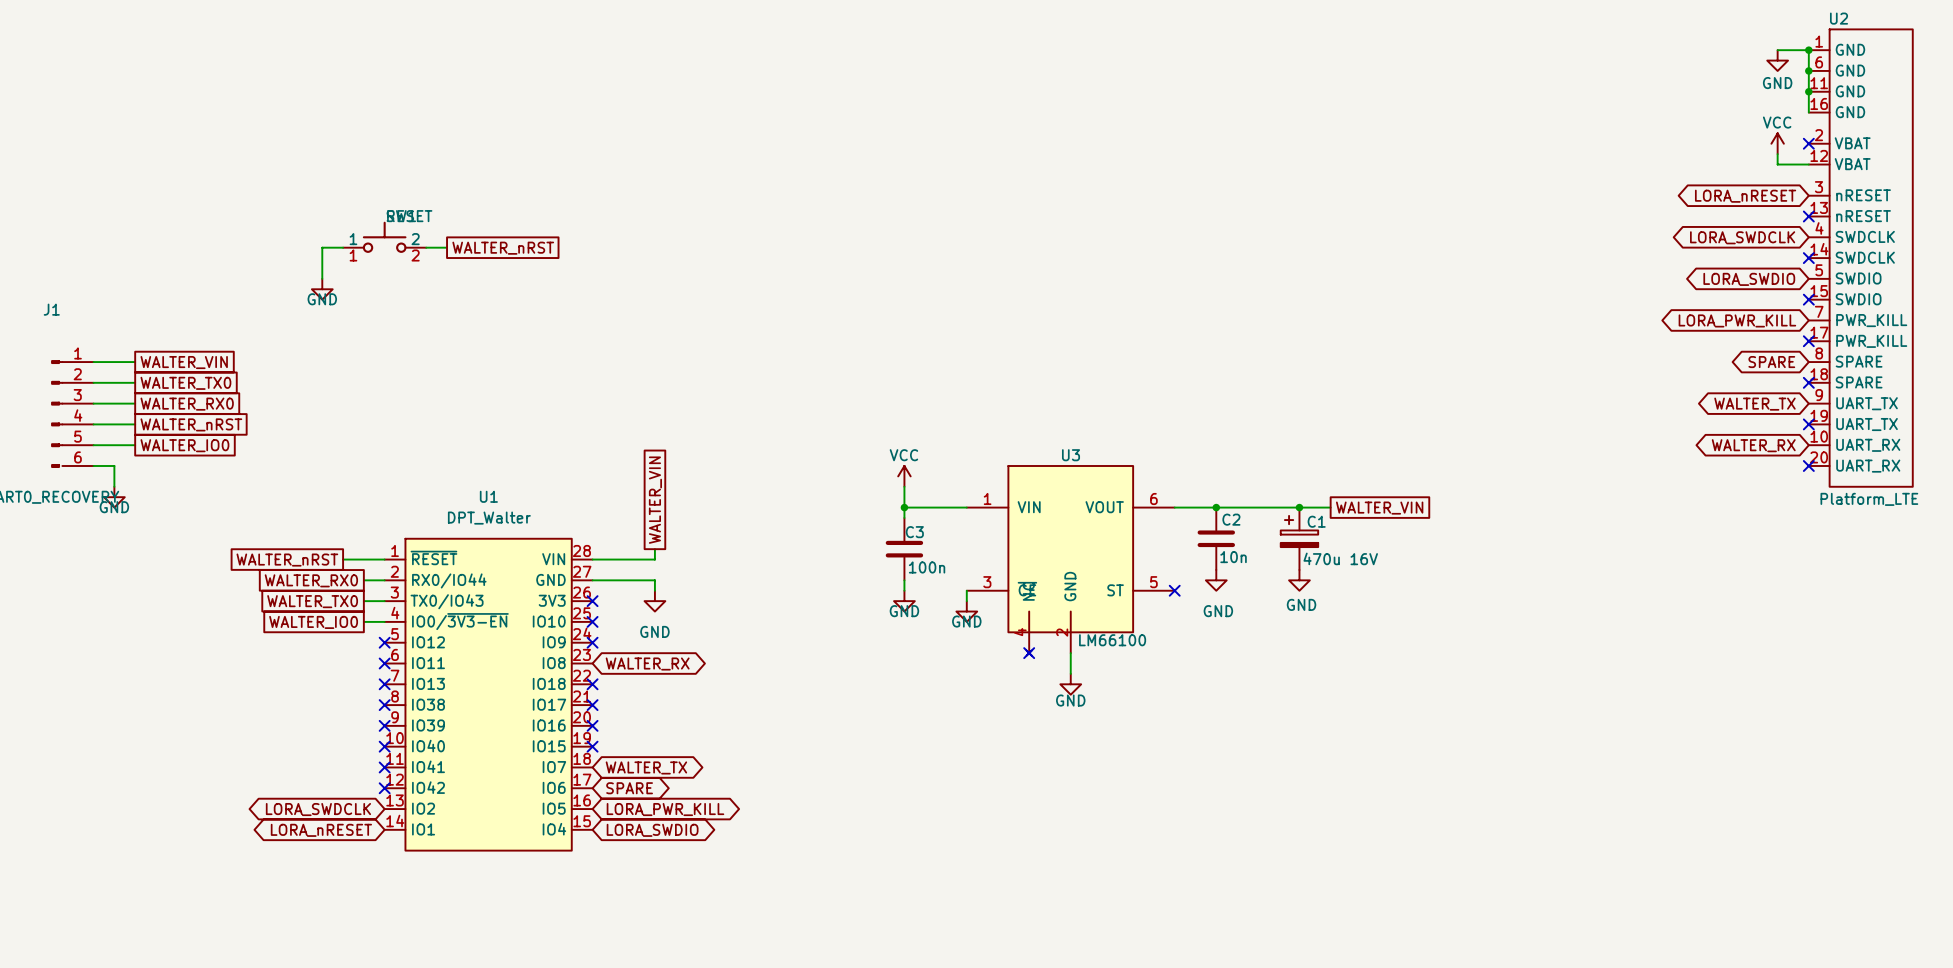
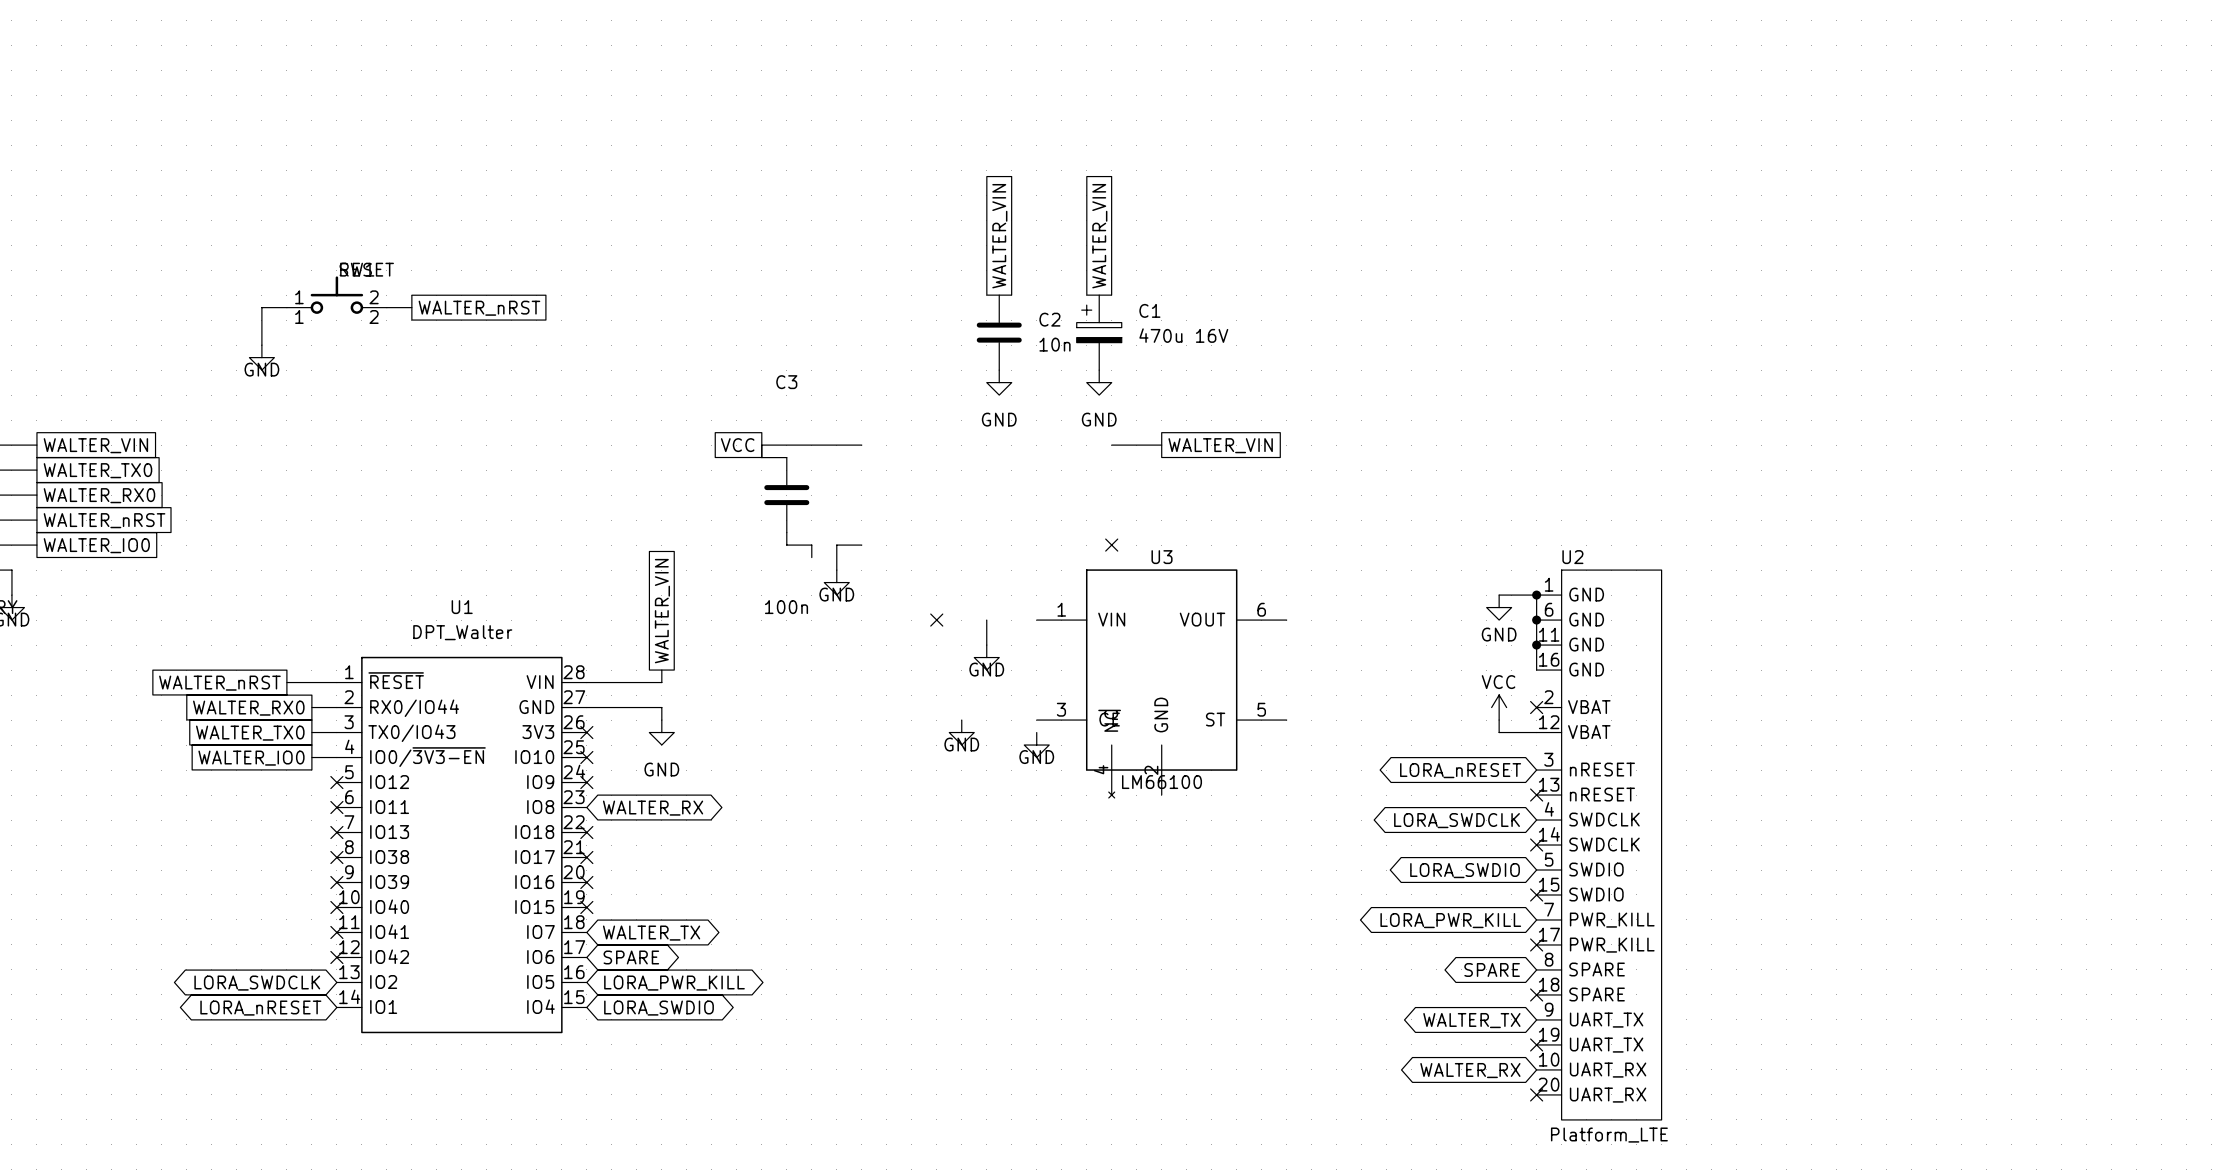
wire: (1777, 50) (1808, 50) (1808, 112) -> none
junction: (1808, 50) -> none
power symbol: GND (1777, 60) -> none
junction: (1808, 70) -> none
junction: (1808, 91) -> none
power symbol: VCC (1777, 143) -> none
no-connect mark: (1808, 143) -> none
wire: (1777, 154) (1777, 164) (1808, 164) -> none
global label: none -> WALTER_VIN (999, 236)
global label: none -> WALTER_VIN (1099, 236)
global label: LORA_nRESET (1745, 196) -> none
no-connect mark: (1808, 216) -> none
global label: LORA_SWDCLK (1742, 237) -> none
no-connect mark: (1808, 258) -> none
U2 position: (1860, 258) -> (1599, 845)
global label: LORA_SWDIO (1749, 279) -> none
no-connect mark: (1808, 299) -> none
power symbol: none -> GND (999, 382)
power symbol: none -> GND (1099, 382)
global label: LORA_PWR_KILL (1737, 320) -> none
no-connect mark: (1808, 341) -> none
global label: none -> VCC (737, 445)
wire: none -> (861, 445) (761, 445) (761, 457) (786, 457)
wire: none -> (1111, 445) (1161, 445)
global label: none -> WALTER_VIN (1220, 445)
global label: SPARE (1771, 362) -> none
no-connect mark: (1808, 382) -> none
global label: WALTER_TX (1754, 404) -> none
no-connect mark: (1808, 424) -> none
wire: none -> (786, 532) (786, 545) (811, 545) (811, 557)
wire: none -> (861, 545) (836, 545) (836, 570)
no-connect mark: none -> (1111, 545)
global label: WALTER_RX (1753, 445) -> none
no-connect mark: (1808, 465) -> none
power symbol: none -> GND (836, 582)
power symbol: VCC (904, 476) -> none
wire: (904, 486) (904, 517) -> none
wire: none -> (1499, 595) (1536, 595) (1536, 670)
junction: none -> (1536, 595)
power symbol: none -> GND (1499, 607)
no-connect mark: none -> (936, 620)
wire: (904, 507) (966, 507) -> none
junction: (904, 507) -> none
wire: none -> (986, 620) (986, 645)
wire: (1174, 507) (1330, 507) -> none
junction: (1216, 507) -> none
junction: (1299, 507) -> none
junction: none -> (1536, 620)
global label: WALTER_VIN (1379, 508) -> none
C2 name position: C2 (1231, 519) -> C2 (1049, 319)
C1 name position: C1 (1316, 521) -> C1 (1149, 310)
junction: none -> (1536, 645)
C3 name position: C3 (914, 532) -> C3 (786, 382)
power symbol: none -> GND (986, 657)
C2 position: (1216, 538) -> (999, 332)
C1 position: (1299, 538) -> (1099, 332)
C3 position: (904, 549) -> (786, 495)
C2 value position: 10n (1233, 557) -> 10n (1054, 344)
C1 value position: 470u 16V (1340, 558) -> 470u 16V (1183, 335)
C3 value position: 100n (927, 567) -> 100n (786, 607)
wire: (904, 580) (904, 590) -> none
power symbol: GND (1216, 580) -> none
power symbol: GND (1299, 580) -> none
power symbol: none -> VCC (1499, 707)
no-connect mark: none -> (1536, 707)
wire: (966, 590) (966, 601) -> none
no-connect mark: (1174, 590) -> none
wire: none -> (1499, 720) (1499, 732) (1536, 732)
global label: none -> LORA_nRESET (1460, 770)
U3 value position: LM66100 (1112, 640) -> LM66100 (1162, 782)
no-connect mark: (1029, 653) -> none
wire: (1070, 653) (1070, 673) -> none
no-connect mark: none -> (1536, 795)
global label: none -> LORA_SWDCLK (1457, 820)
power symbol: GND (1070, 684) -> none
no-connect mark: none -> (1536, 845)
global label: none -> LORA_SWDIO (1465, 870)
no-connect mark: none -> (1536, 894)
global label: none -> LORA_PWR_KILL (1450, 920)
no-connect mark: none -> (1536, 944)
global label: none -> SPARE (1492, 969)
no-connect mark: none -> (1536, 994)
global label: none -> WALTER_TX (1471, 1020)
no-connect mark: none -> (1536, 1044)
global label: none -> WALTER_RX (1470, 1070)
no-connect mark: none -> (1536, 1094)

